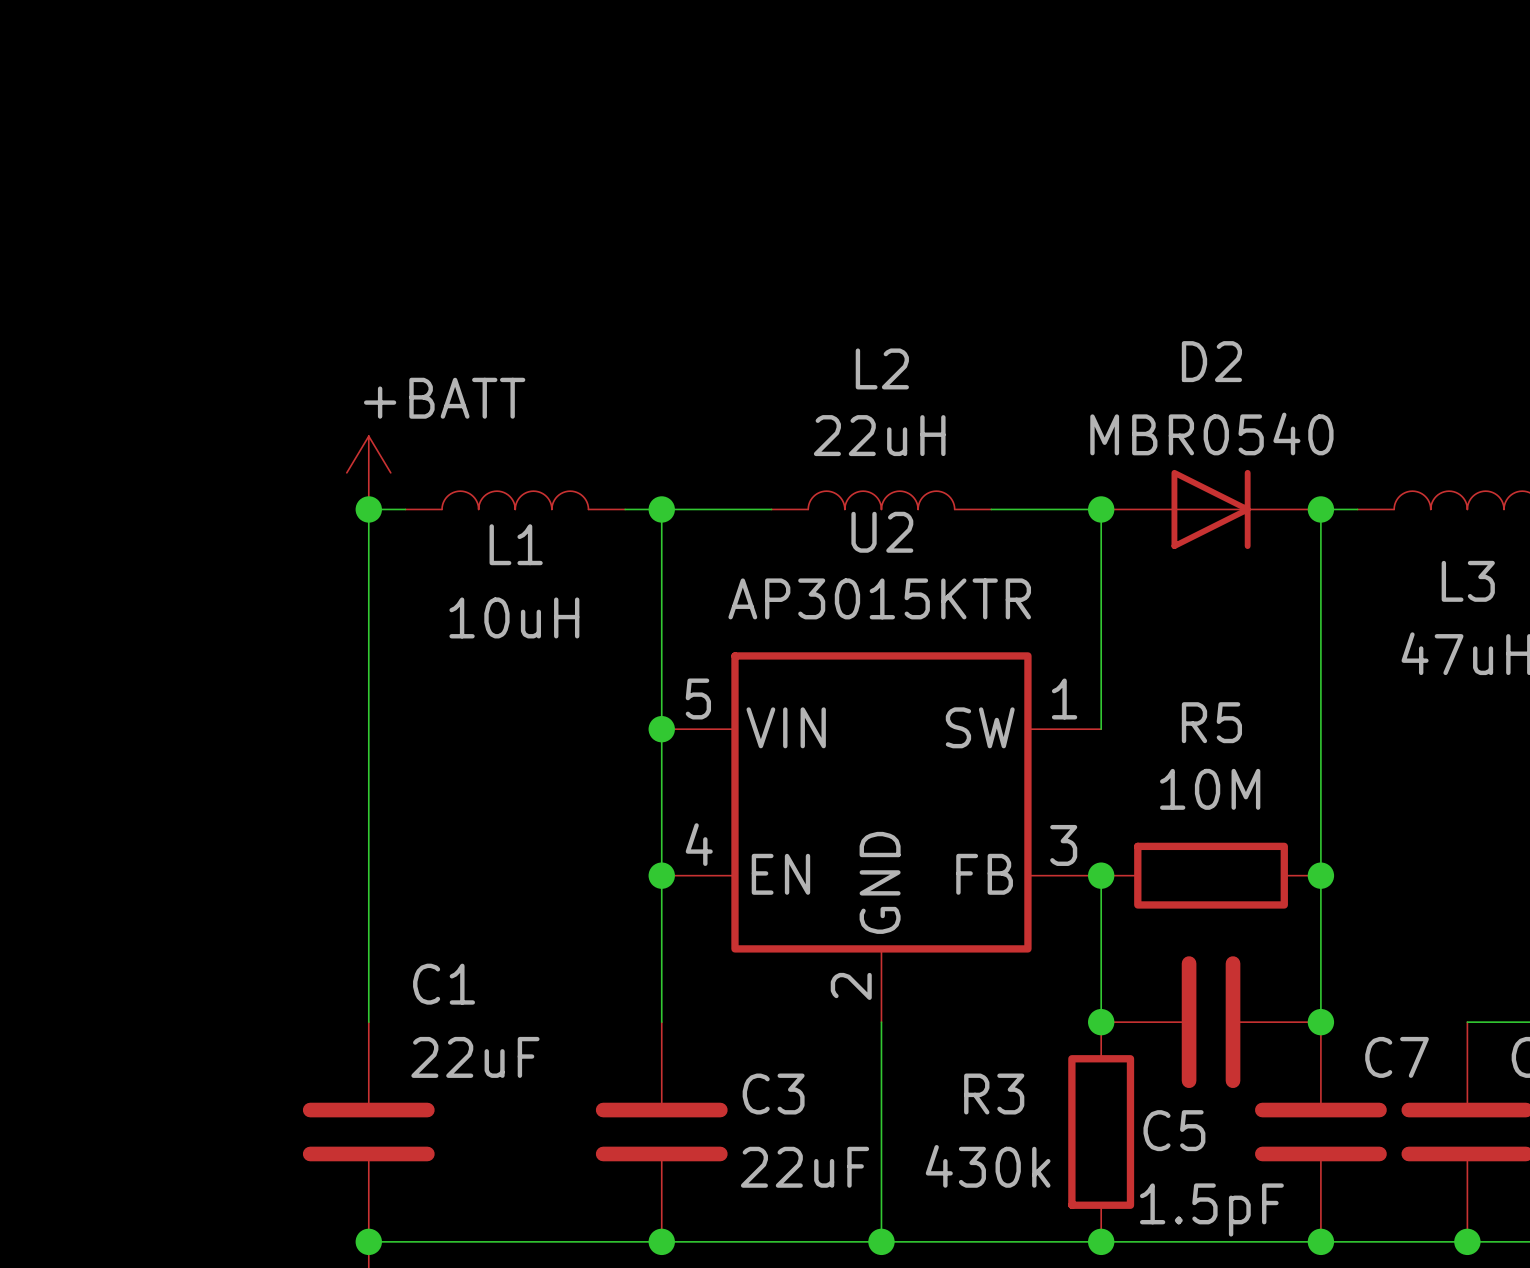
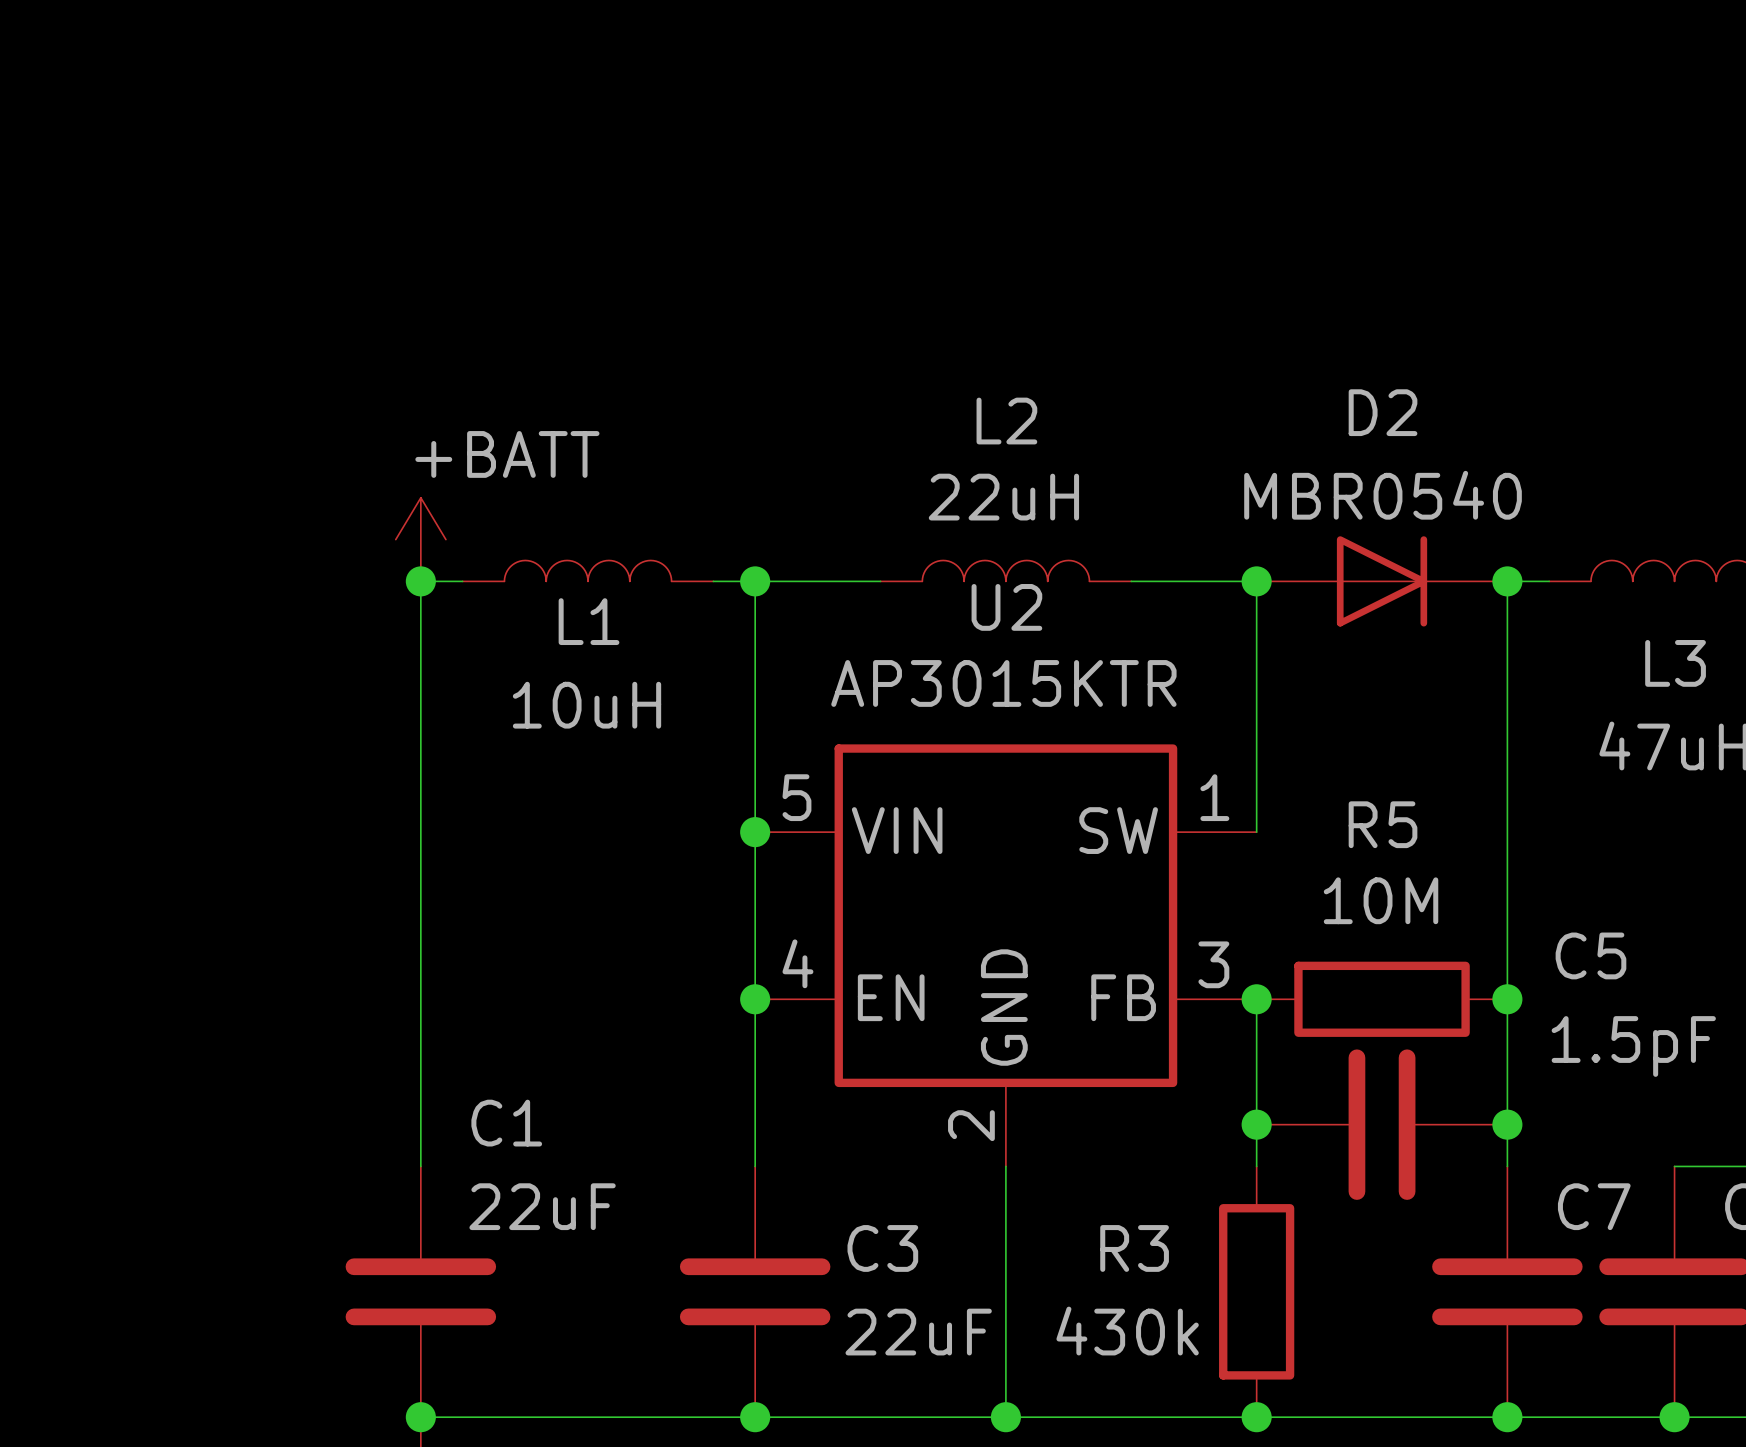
junction position: (1101, 1022) -> (1256, 1124)
C5 position: (1211, 1022) -> (1382, 1124)
junction position: (1320, 1022) -> (1507, 1124)
C5 name position: C5 (1174, 1130) -> C5 (1590, 955)
C5 value position: 1.5pF (1211, 1209) -> 1.5pF (1633, 1046)

